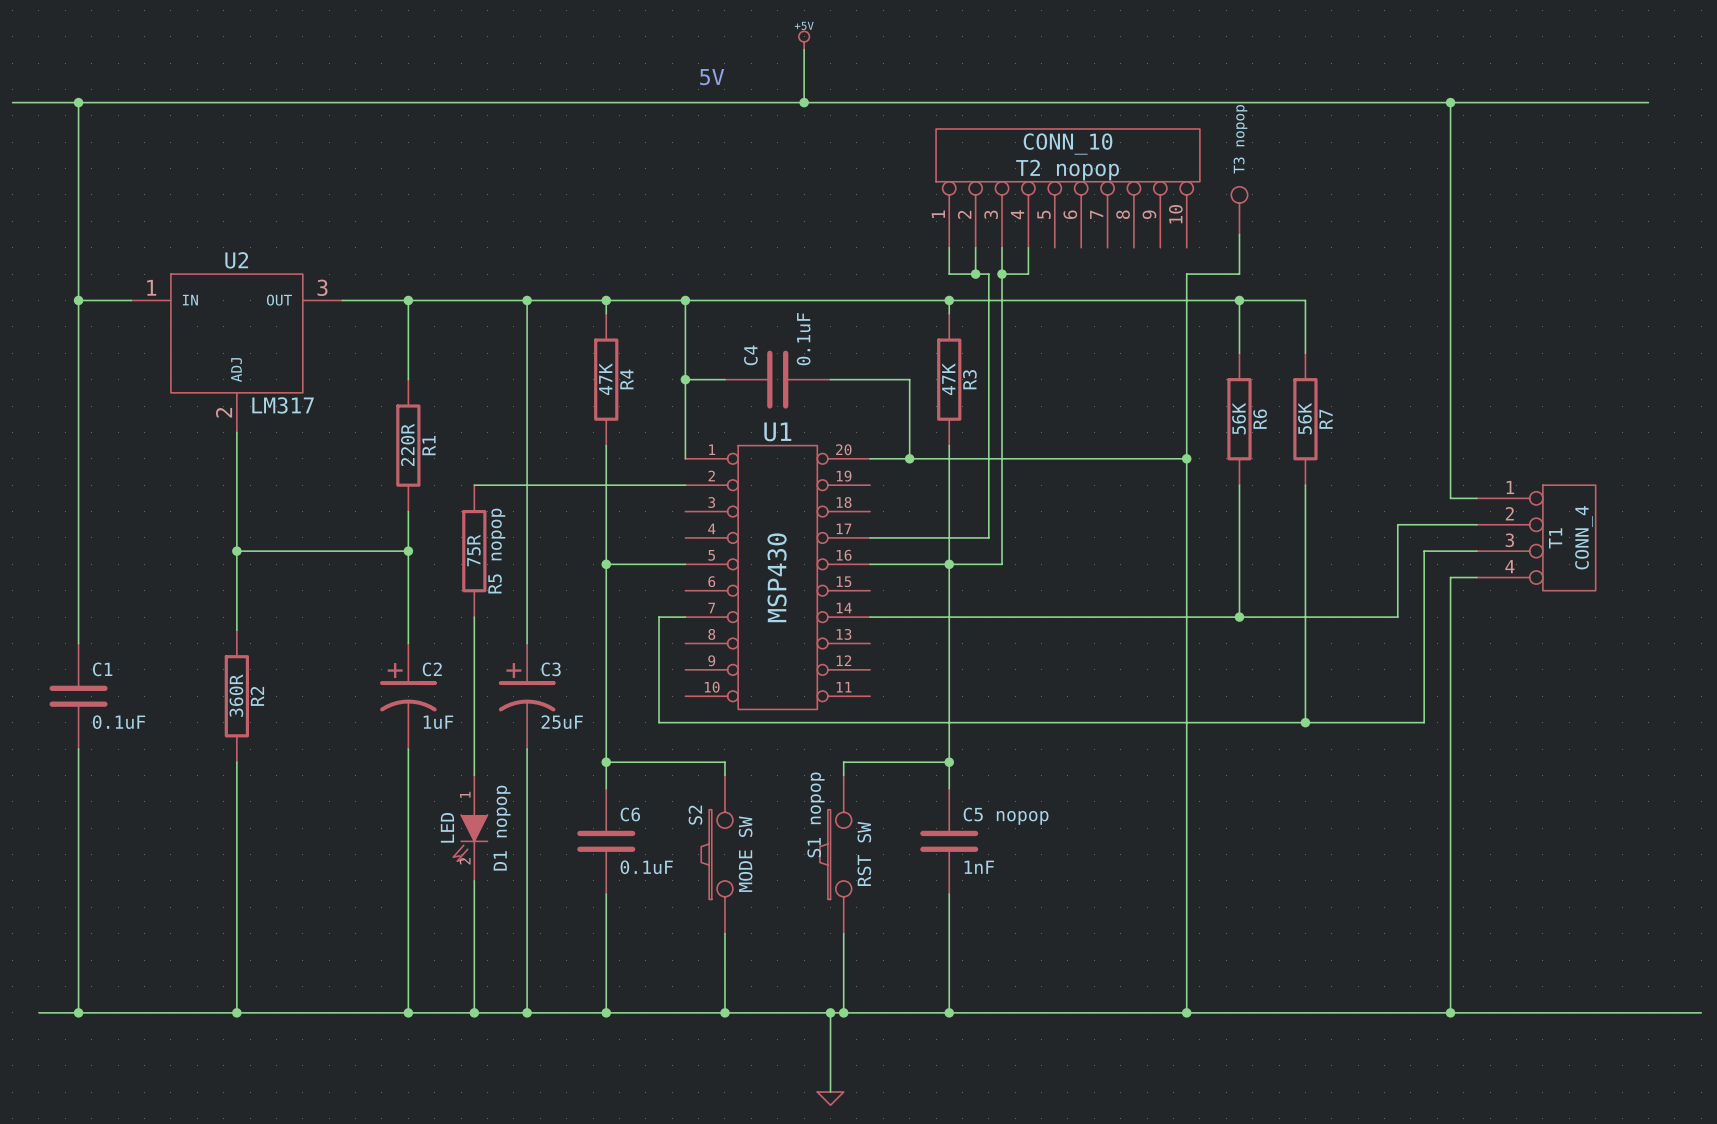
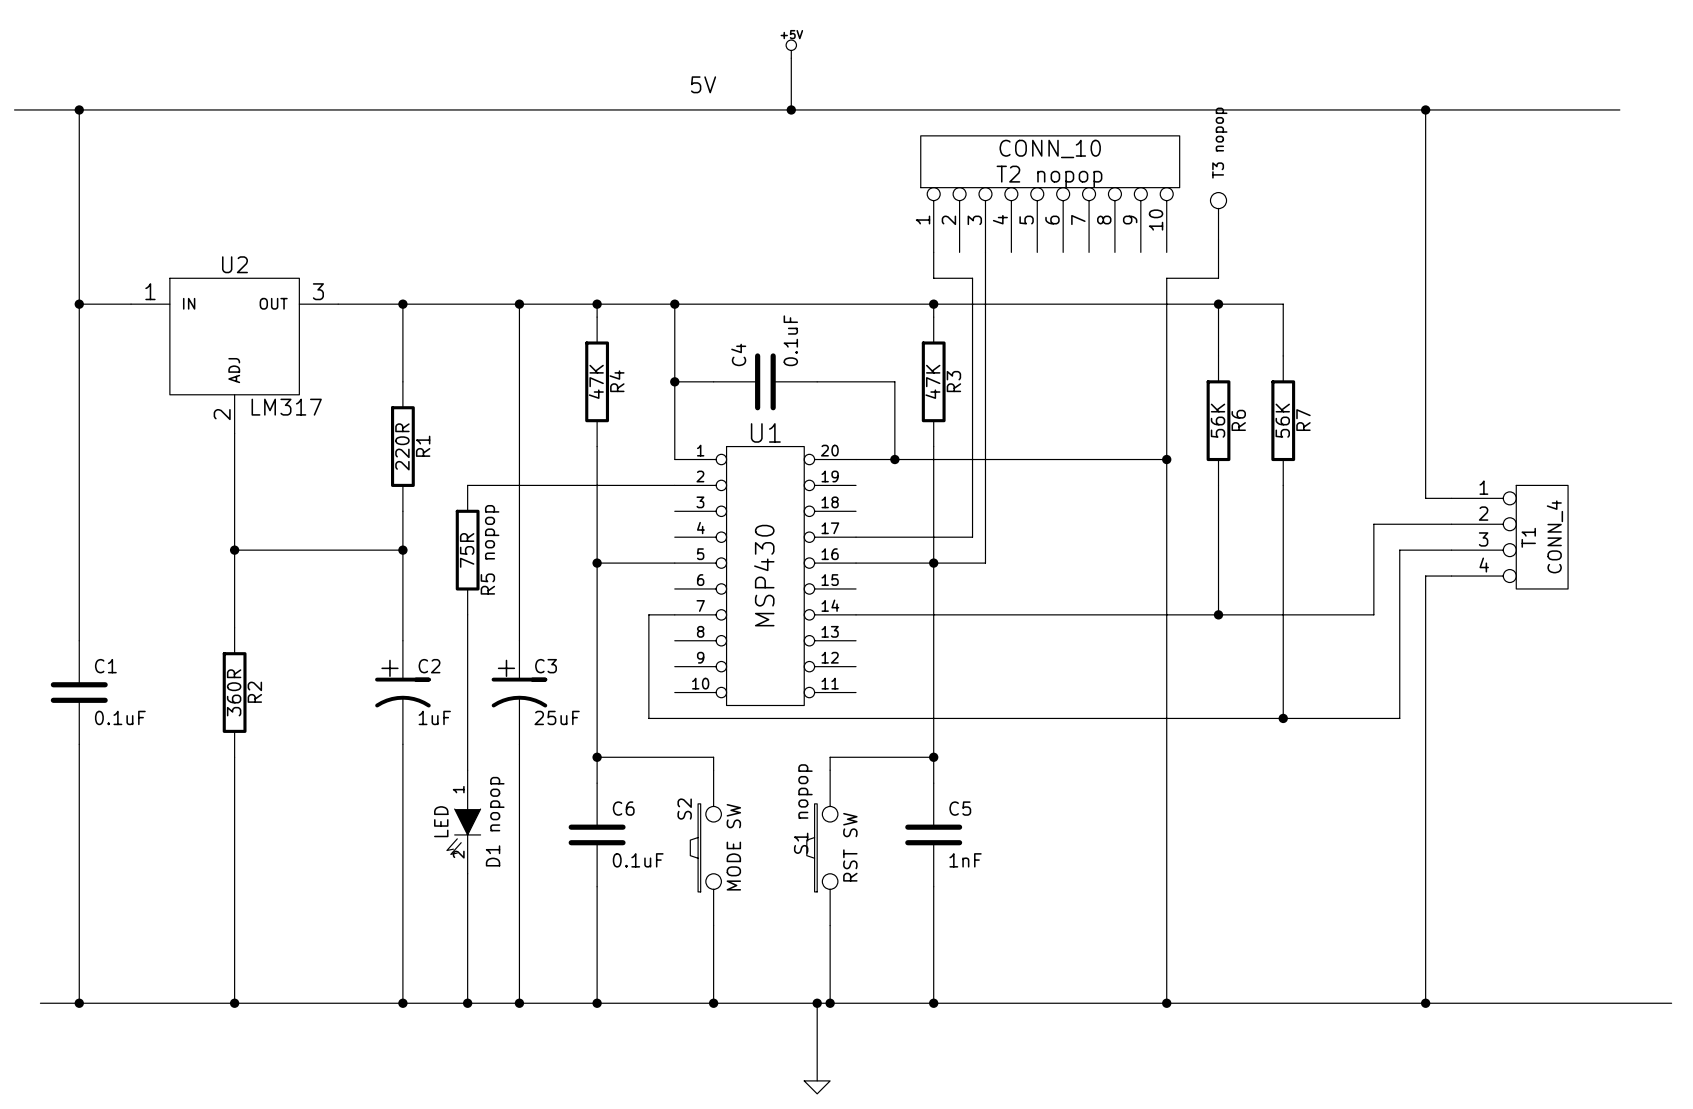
wire: (975, 247) (975, 274) -> none
wire: (1028, 247) (1028, 274) (1002, 274) -> none
junction: (975, 274) -> none
junction: (1002, 274) -> none
C5 nopop name: C5 nopop (1006, 816) -> C5 (960, 808)

